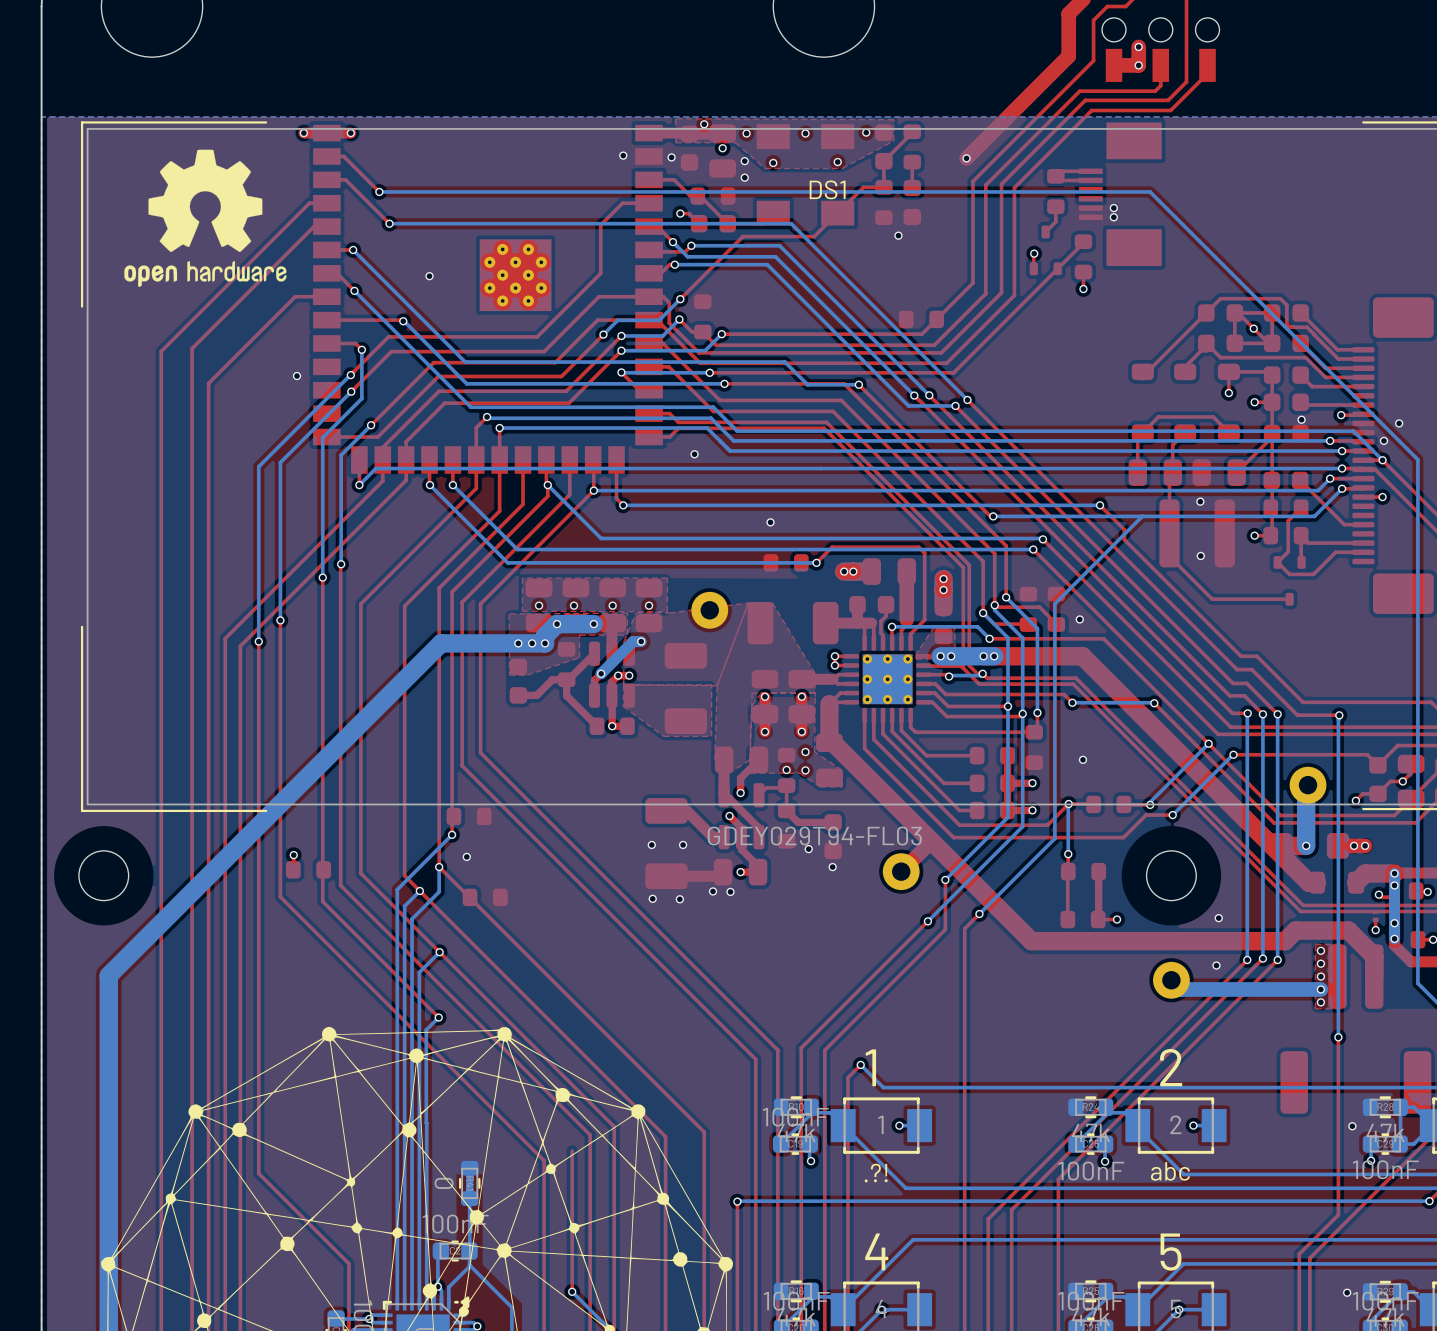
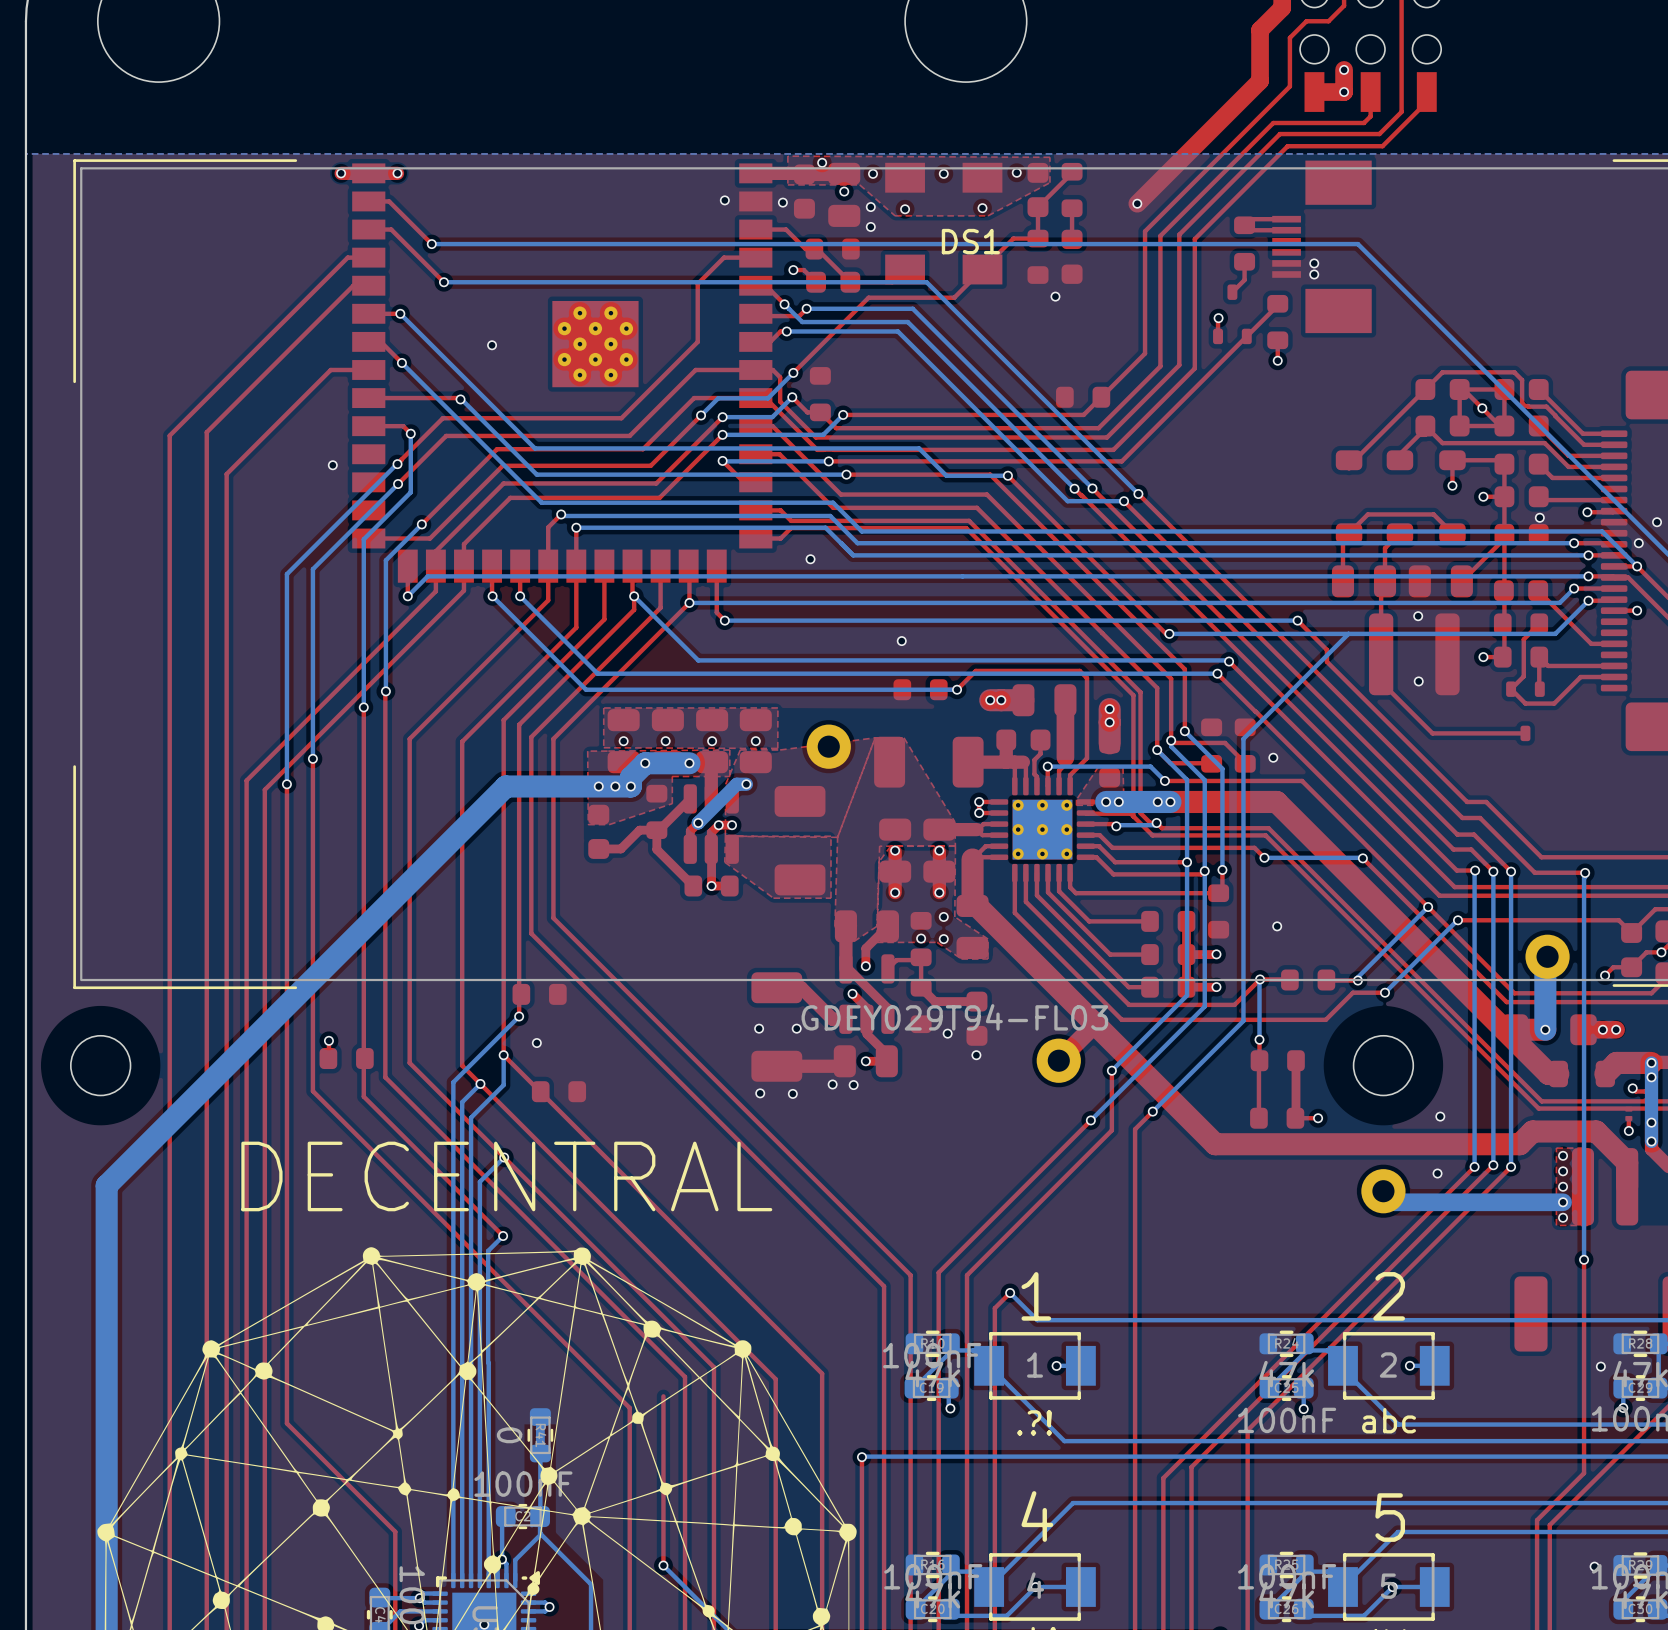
drawing: [124, 149, 287, 287] -> none
text: none -> DECENTRAL (506, 1176)

